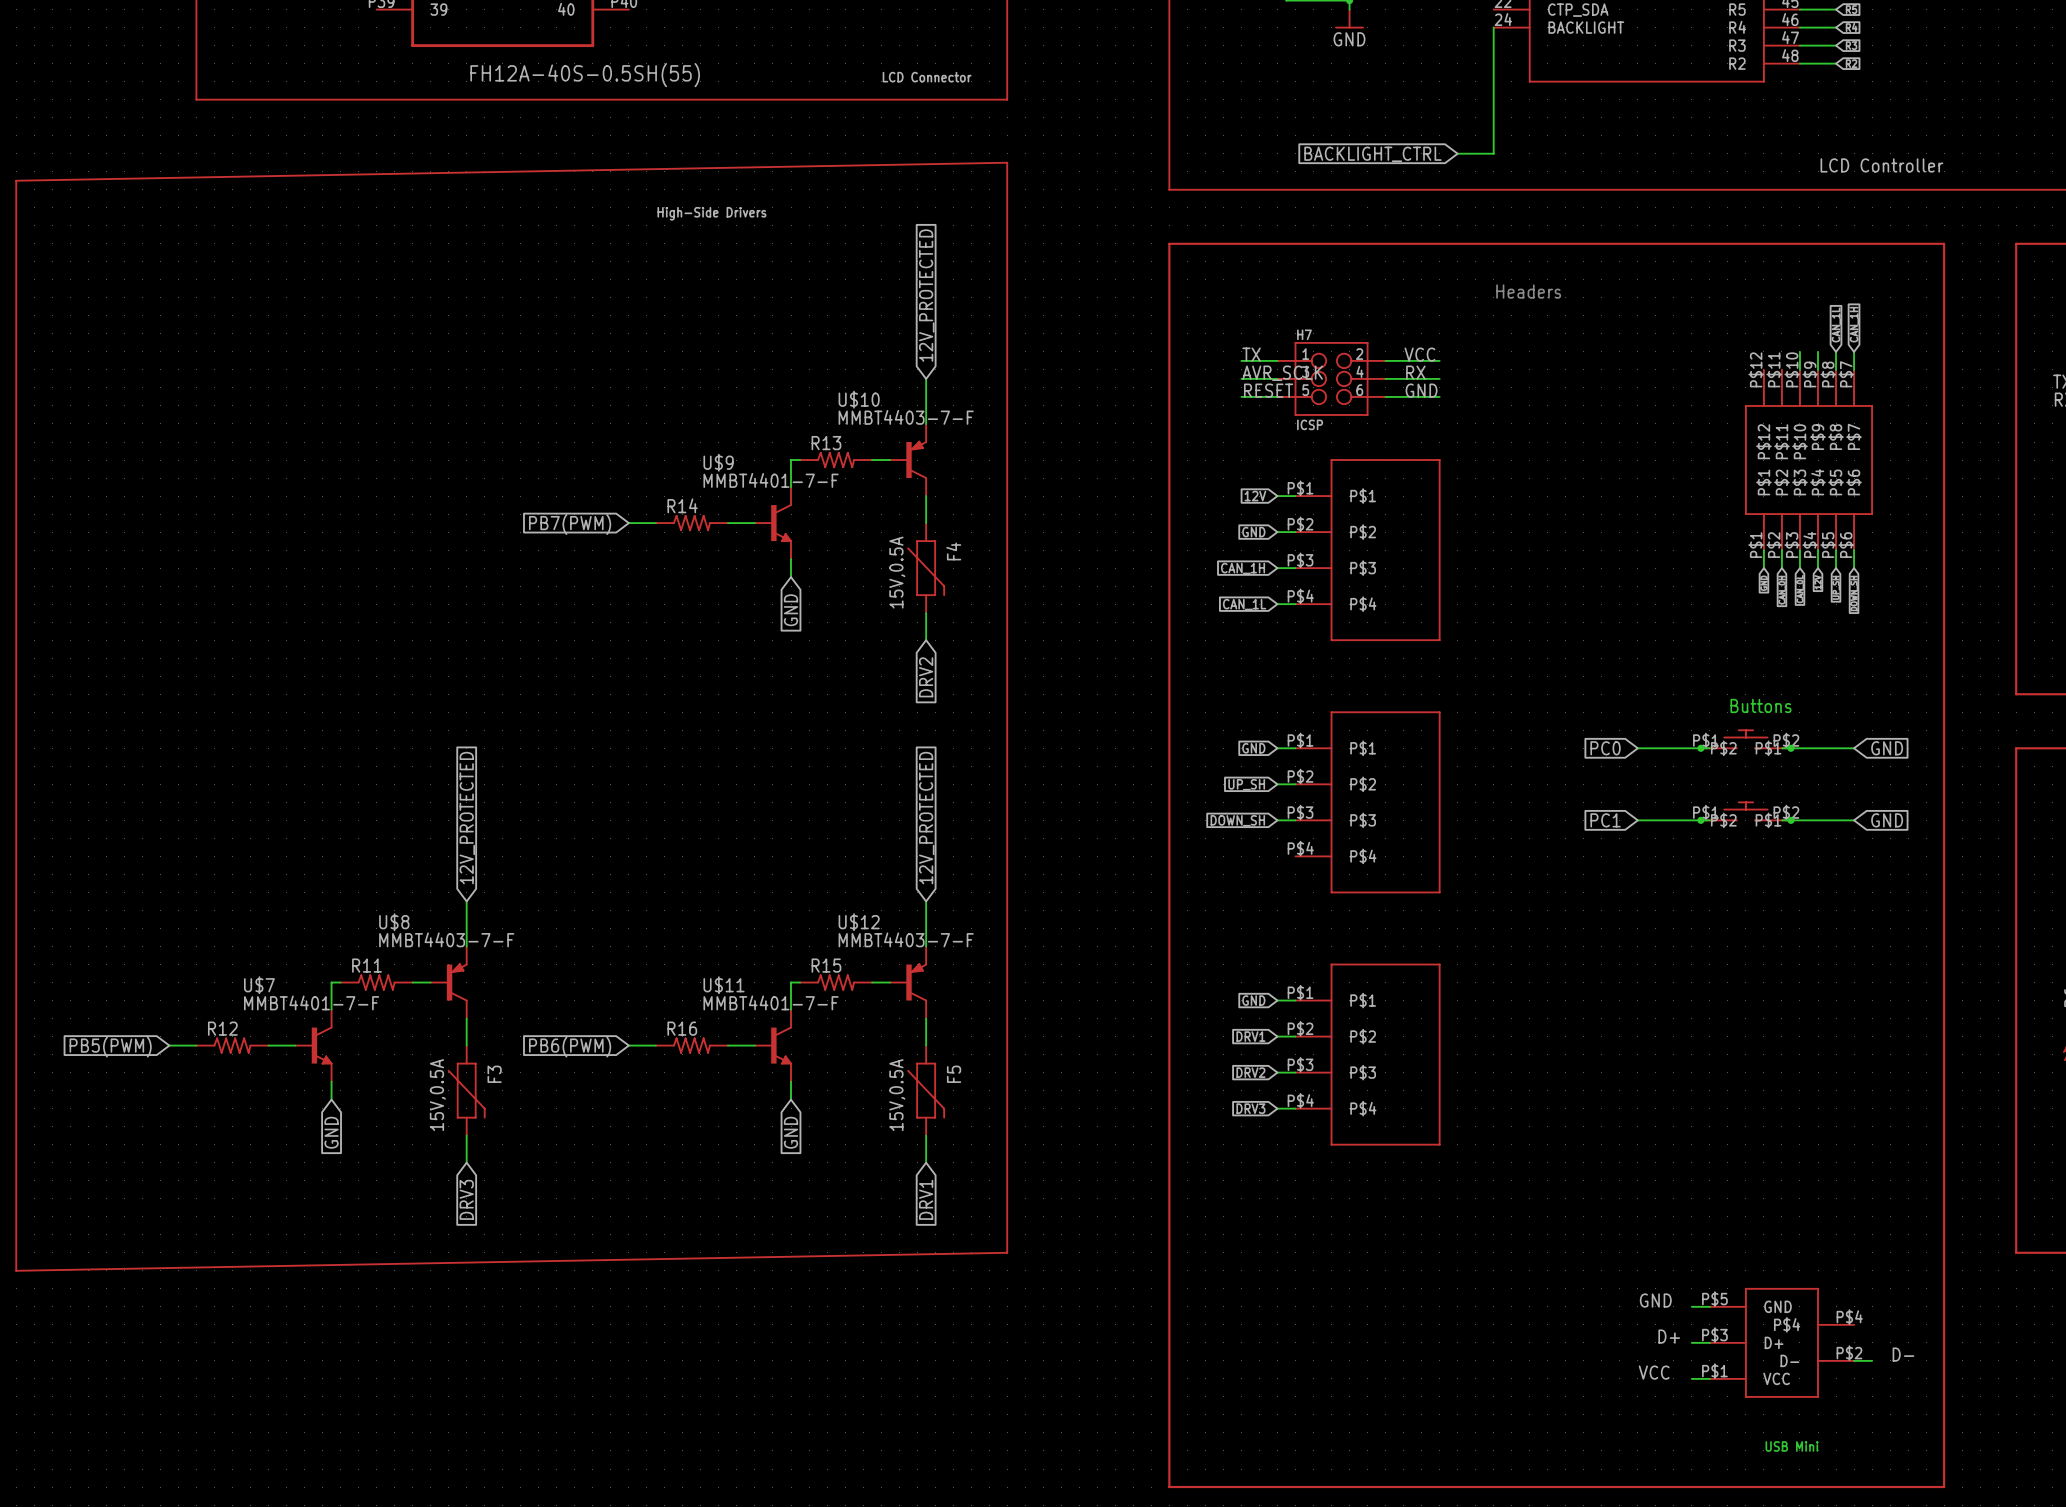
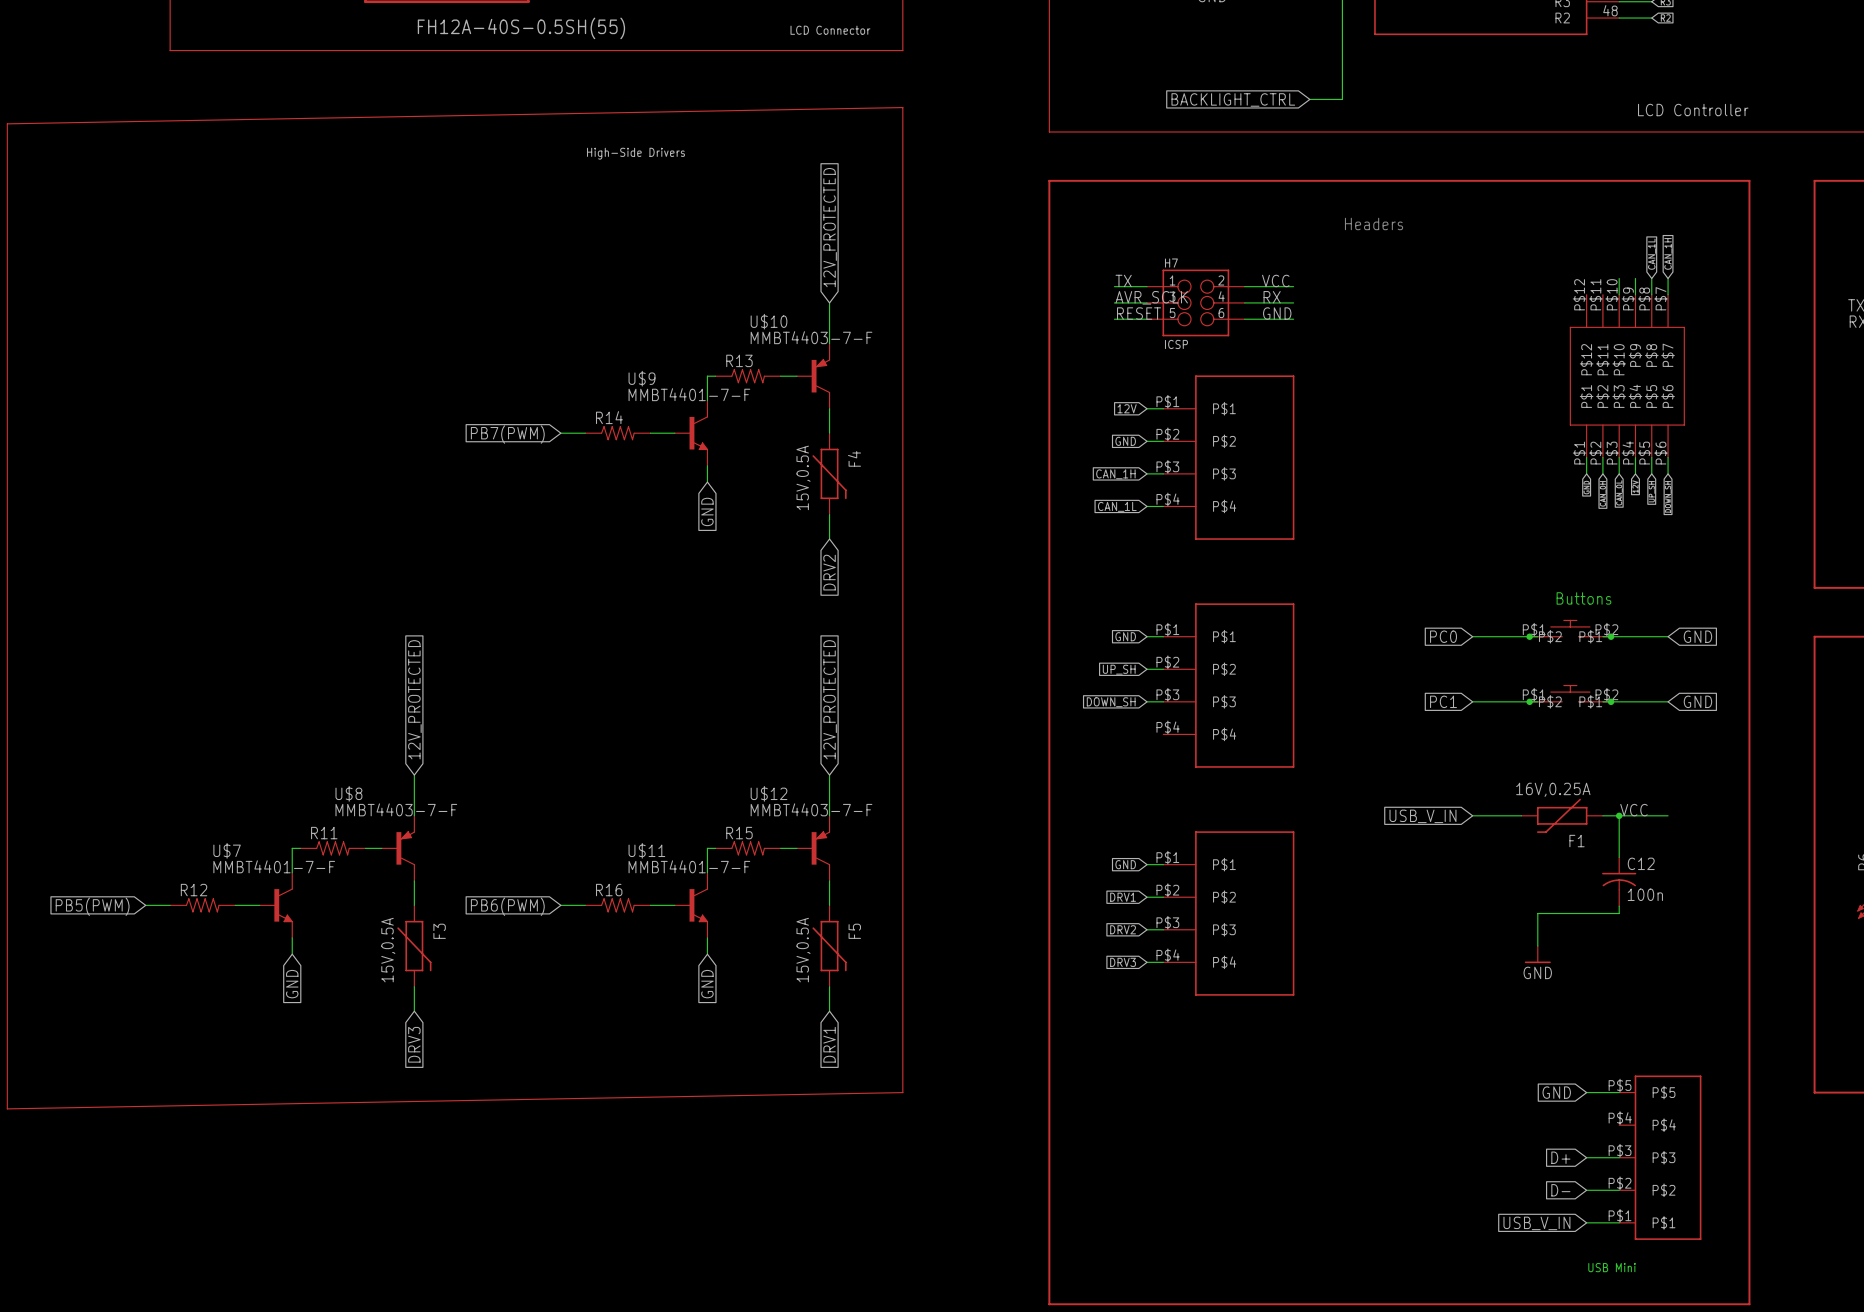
label: none -> VCC (1633, 810)
wire: none -> (1472, 815) (1521, 815)
F1: none -> 16V,0.25A (1562, 815)
wire: none -> (1602, 815) (1668, 815)
wire: none -> (1619, 815) (1619, 857)
junction: none -> (1619, 815)
global label: none -> USB_V_IN (1422, 816)
C12: none -> 100n (1619, 881)
wire: none -> (1619, 906) (1619, 913) (1537, 913) (1537, 946)
power symbol: none -> GND (1537, 954)
global label: none -> GND (1556, 1092)
wire: none -> (1586, 1092) (1619, 1092)
label: GND (1655, 1300) -> none
wire: (1691, 1306) (1709, 1306) -> none
global label: none -> D+ (1560, 1157)
wire: none -> (1586, 1157) (1619, 1157)
part: none -> (1660, 1157)
label: D+ (1669, 1336) -> none
wire: (1691, 1342) (1709, 1342) -> none
part: (1781, 1342) -> none
label: D- (1903, 1354) -> none
global label: none -> D- (1560, 1190)
wire: none -> (1586, 1190) (1619, 1190)
wire: (1854, 1360) (1872, 1360) -> none
label: VCC (1654, 1372) -> none
wire: (1691, 1378) (1709, 1378) -> none
global label: none -> USB_V_IN (1536, 1223)

